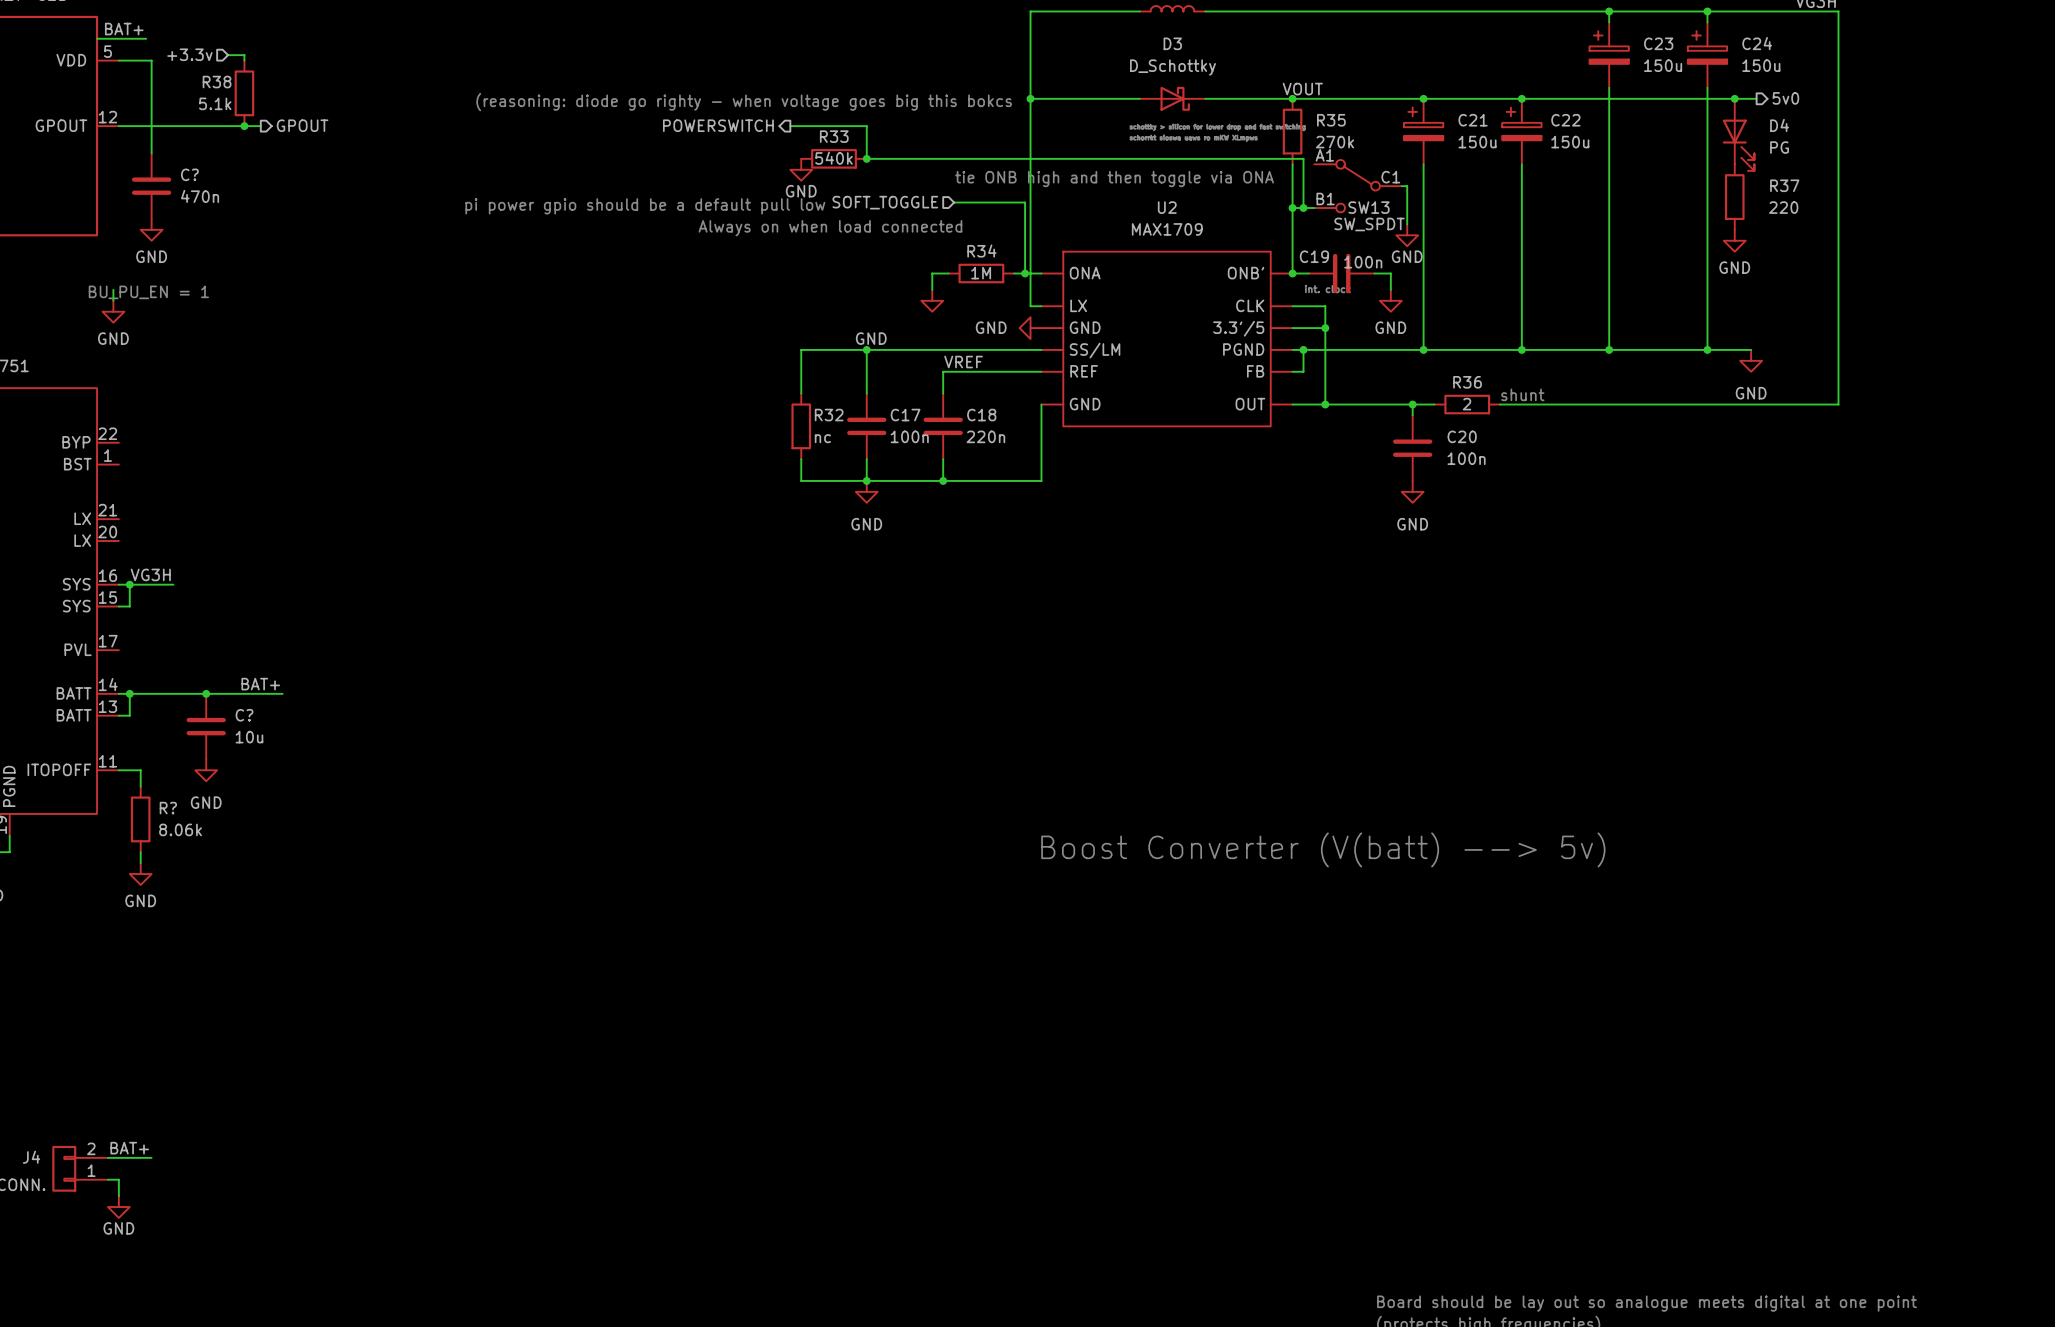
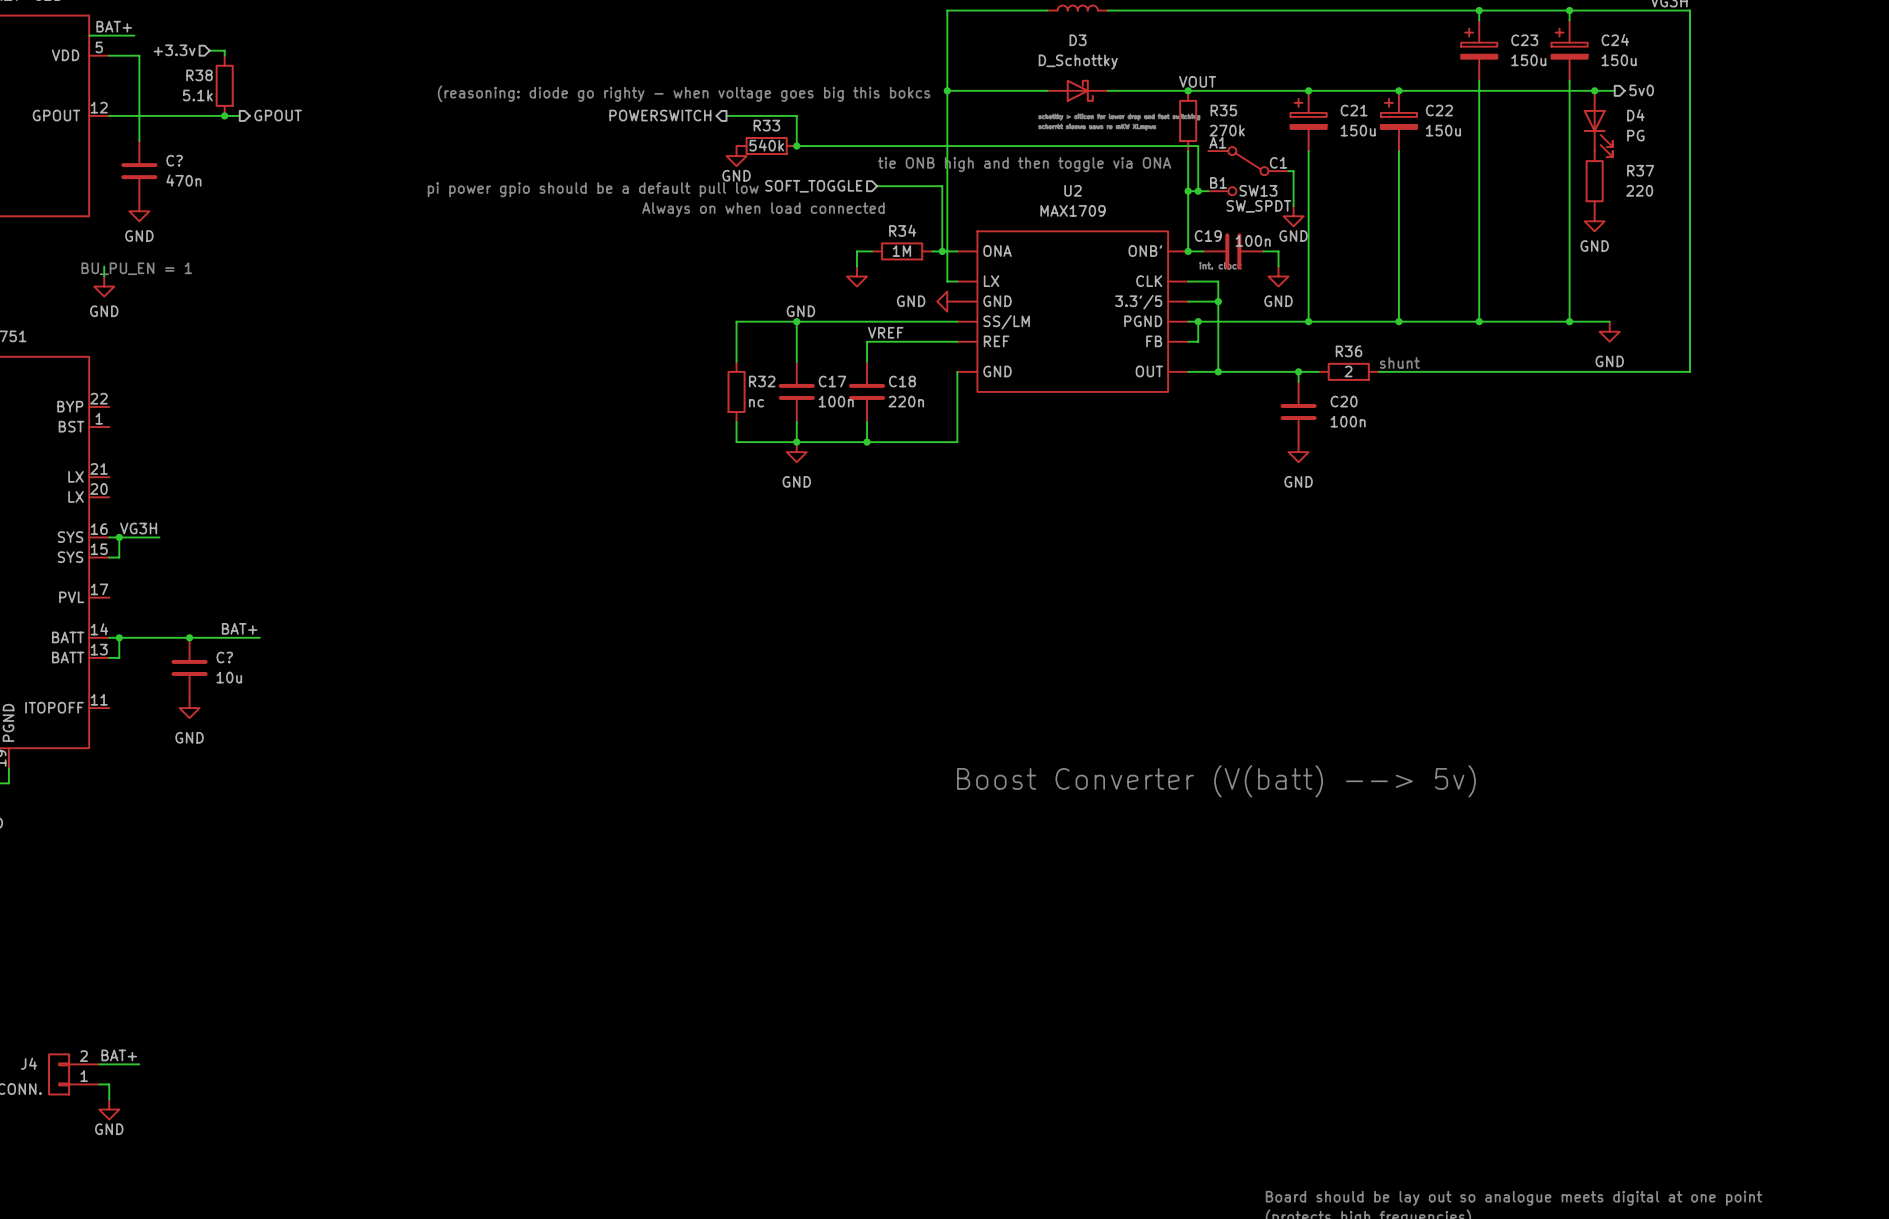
wire: (118, 770) (140, 770) (140, 786) -> none
R?: 8.06k (140, 819) -> none
wire: (140, 852) (140, 863) -> none
power symbol: GND (140, 874) -> none

